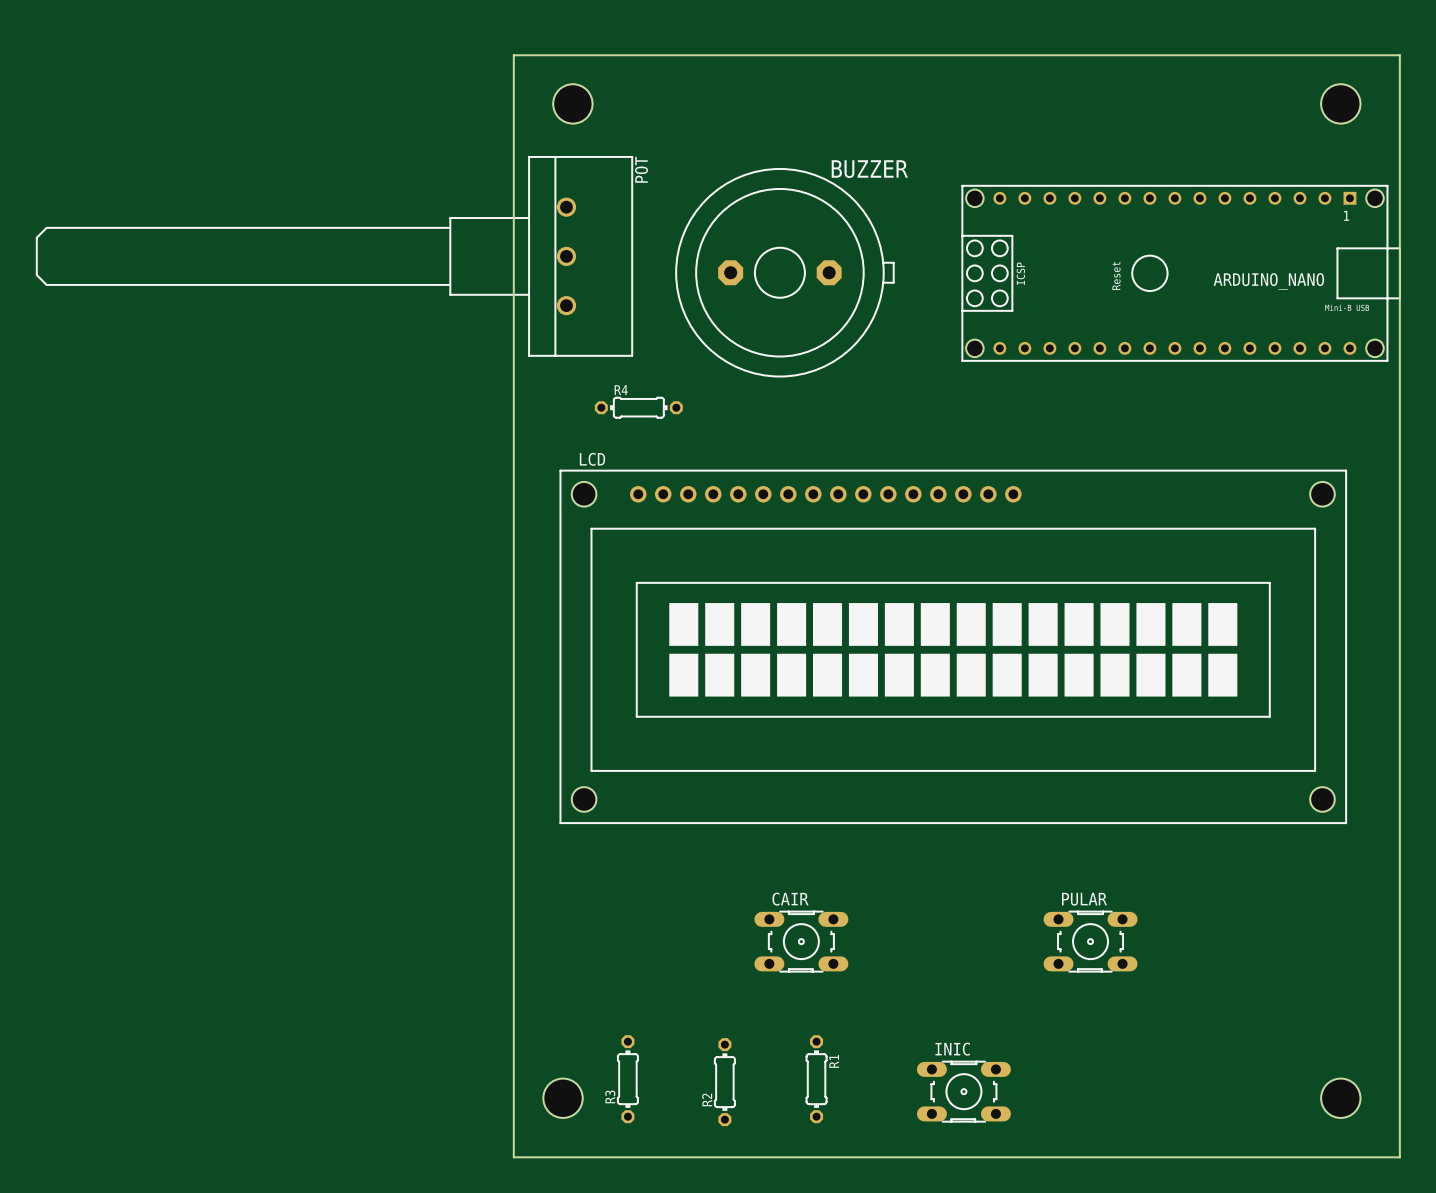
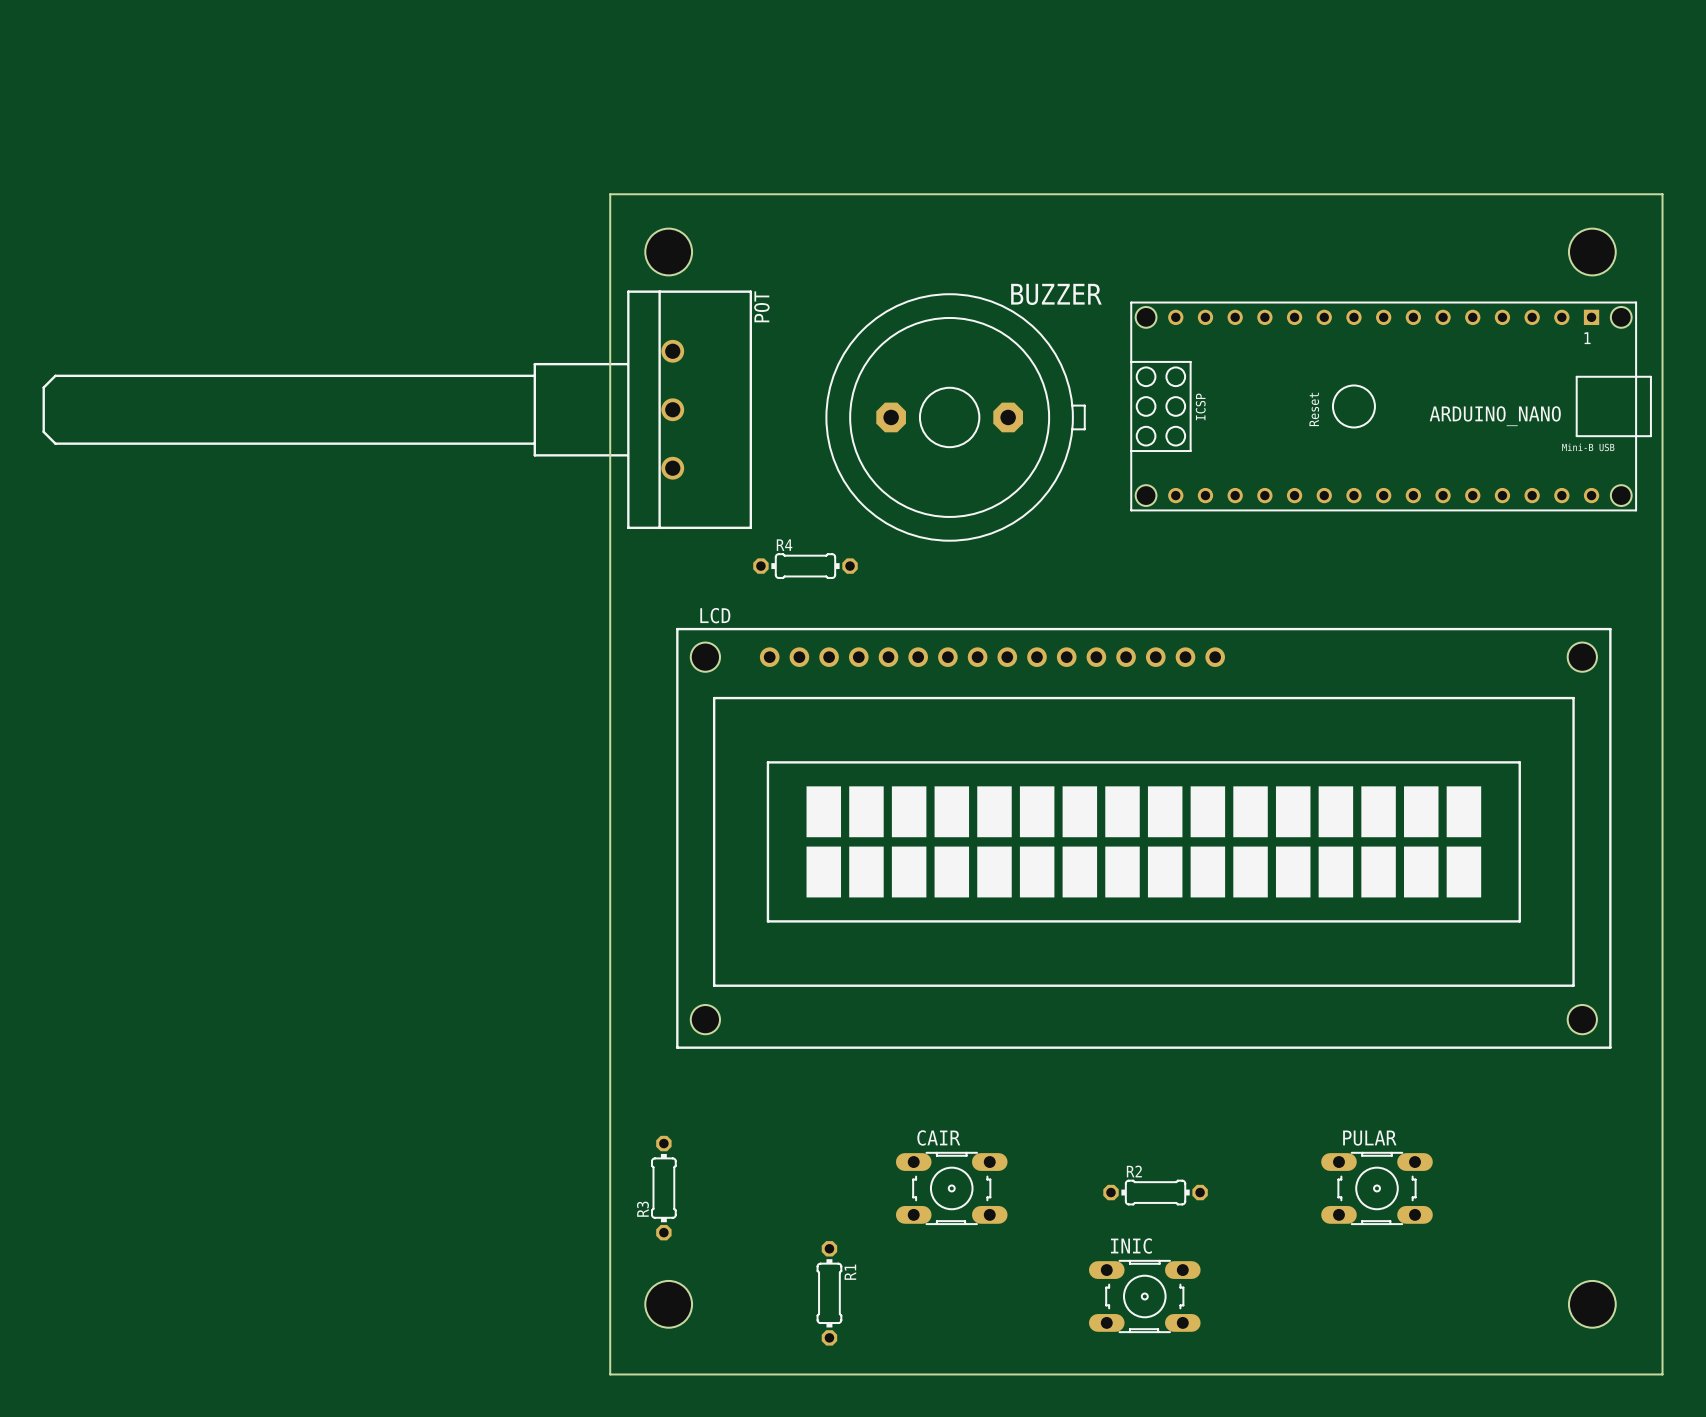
hole position: (572, 103) -> (668, 252)
hole position: (1340, 103) -> (1592, 252)
board edge: (513, 163) (513, 55) (1399, 55) (1399, 163) -> (610, 194) (1662, 194)
POT position: (334, 256) -> (397, 409)
BUZZER position: (784, 272) -> (955, 417)
ARDUINO_NANO position: (1181, 273) -> (1391, 406)
R4 position: (638, 407) -> (805, 566)
LCD position: (953, 646) -> (1143, 838)
CAIR position: (801, 941) -> (951, 1188)
PULAR position: (1090, 941) -> (1376, 1188)
R3 position: (627, 1079) -> (663, 1188)
R1 position: (816, 1079) -> (829, 1293)
R2 rotation: 0° (724, 1082) -> 90° clockwise (1155, 1192)
R2 position: (724, 1082) -> (1155, 1192)

